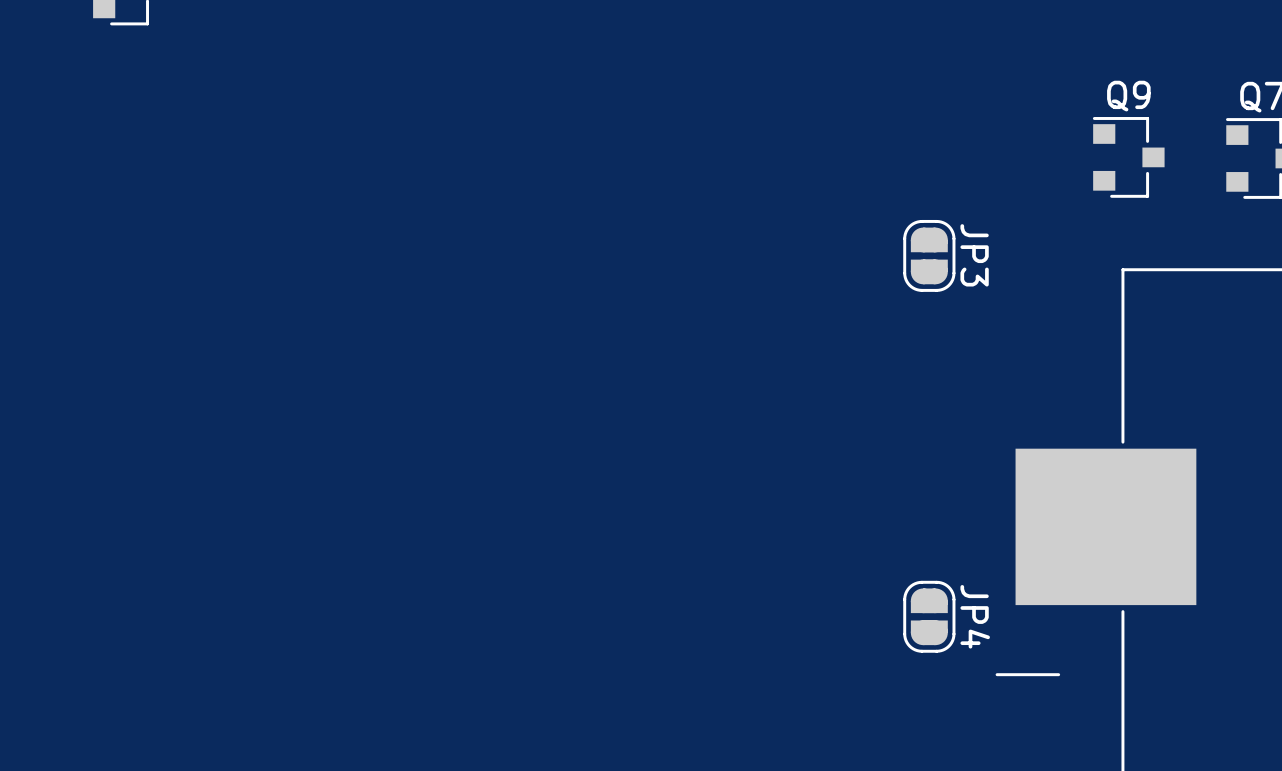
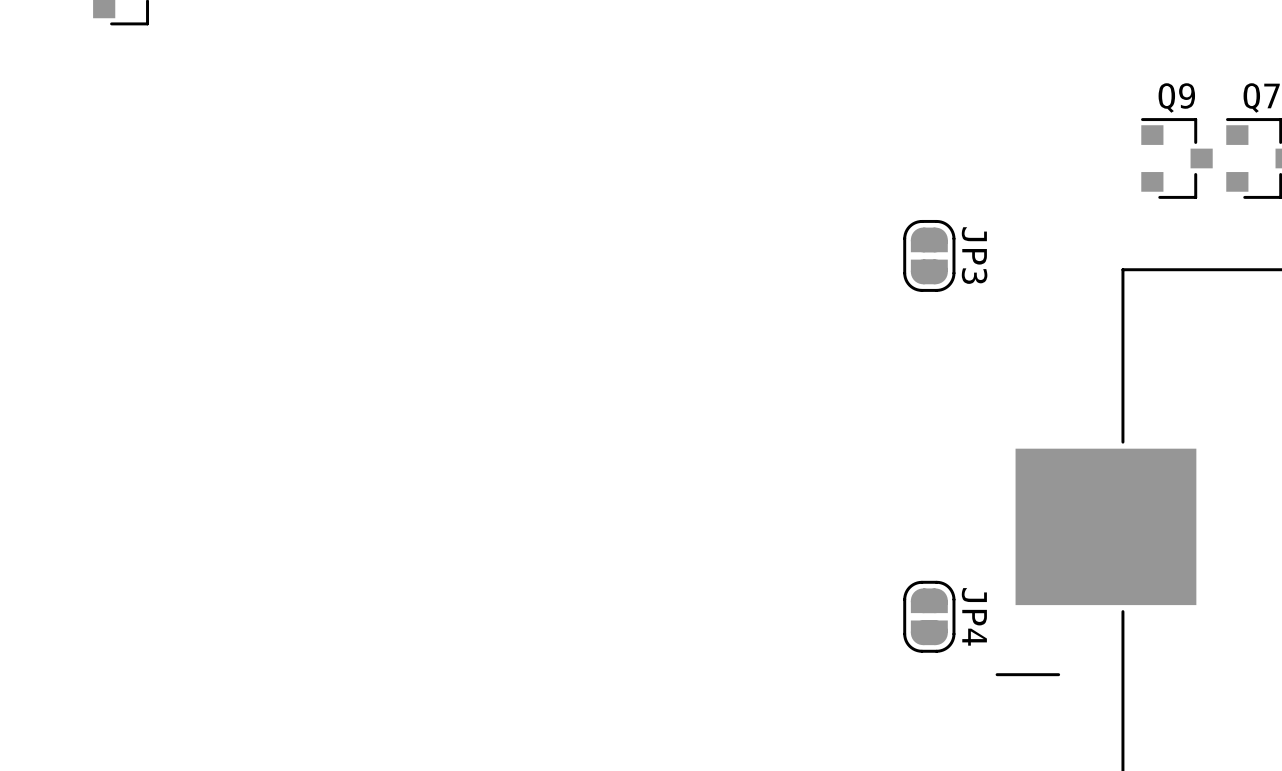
Q9 position: (1128, 157) -> (1176, 158)

